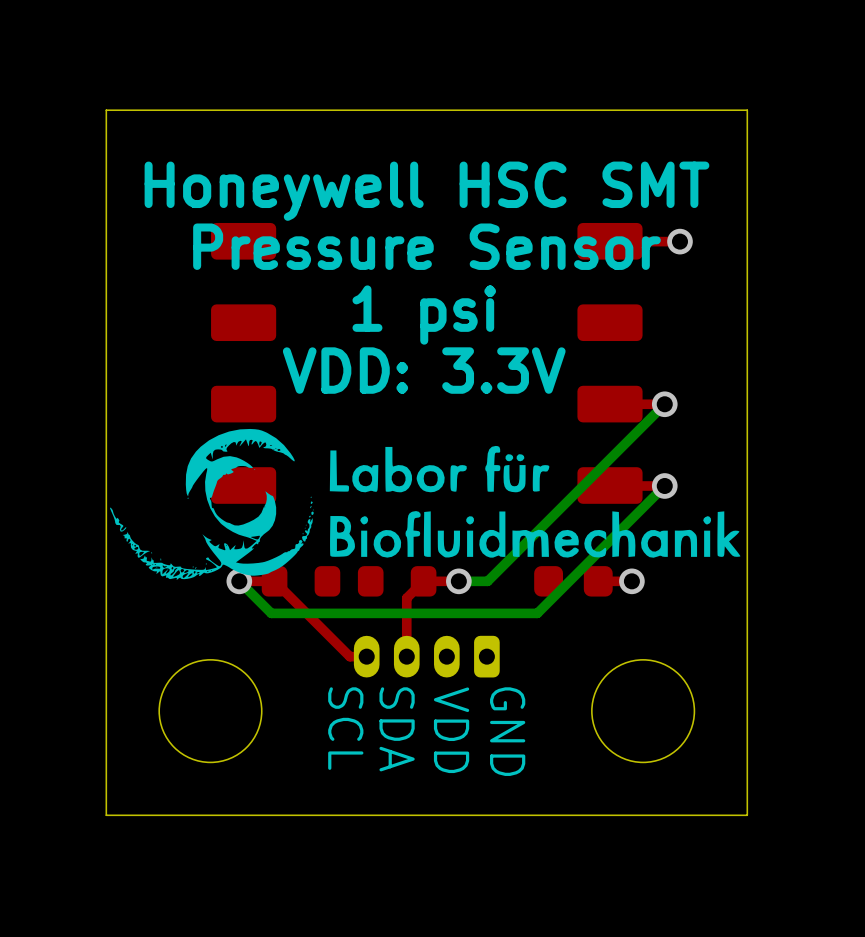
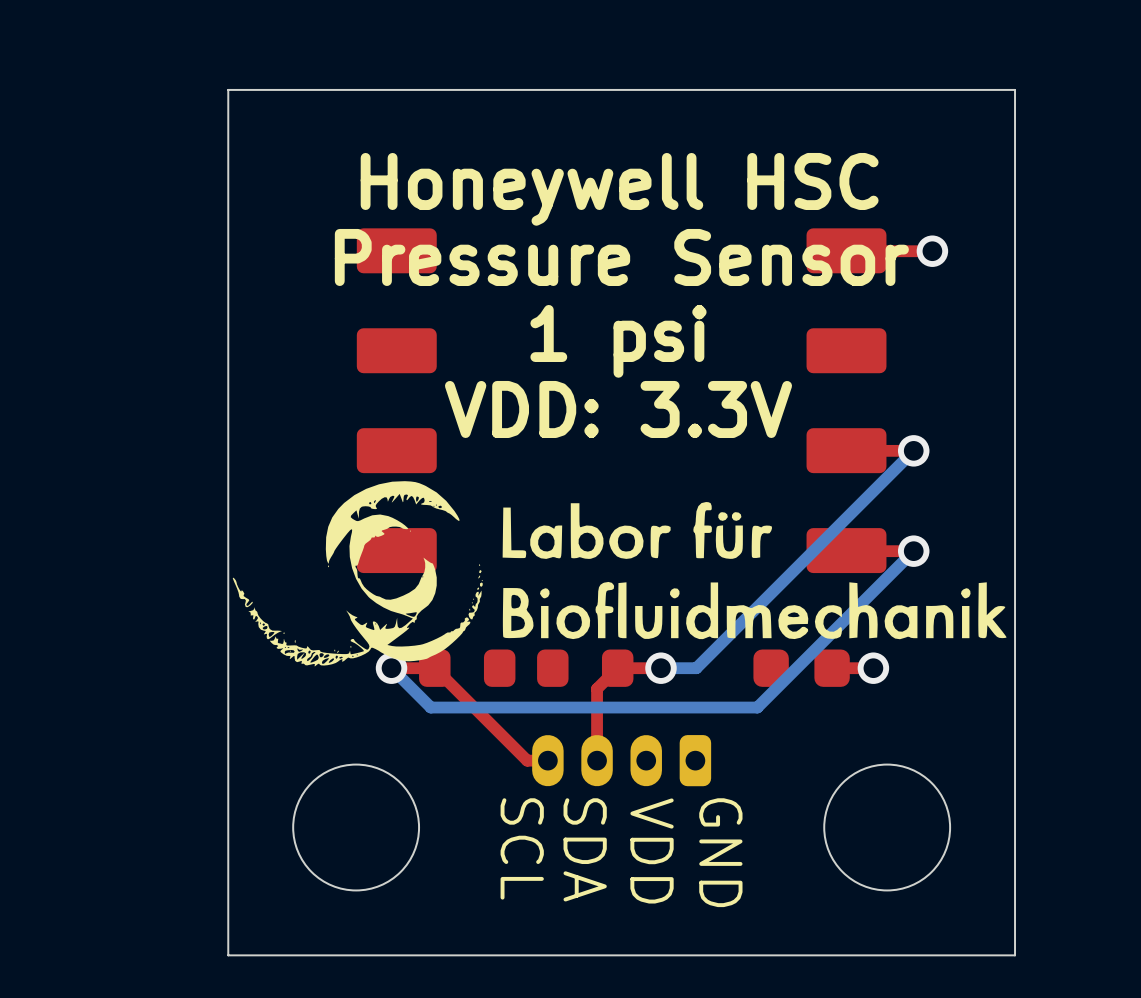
text: Honeywell HSC SMT (426, 191) -> Honeywell HSC (619, 189)

